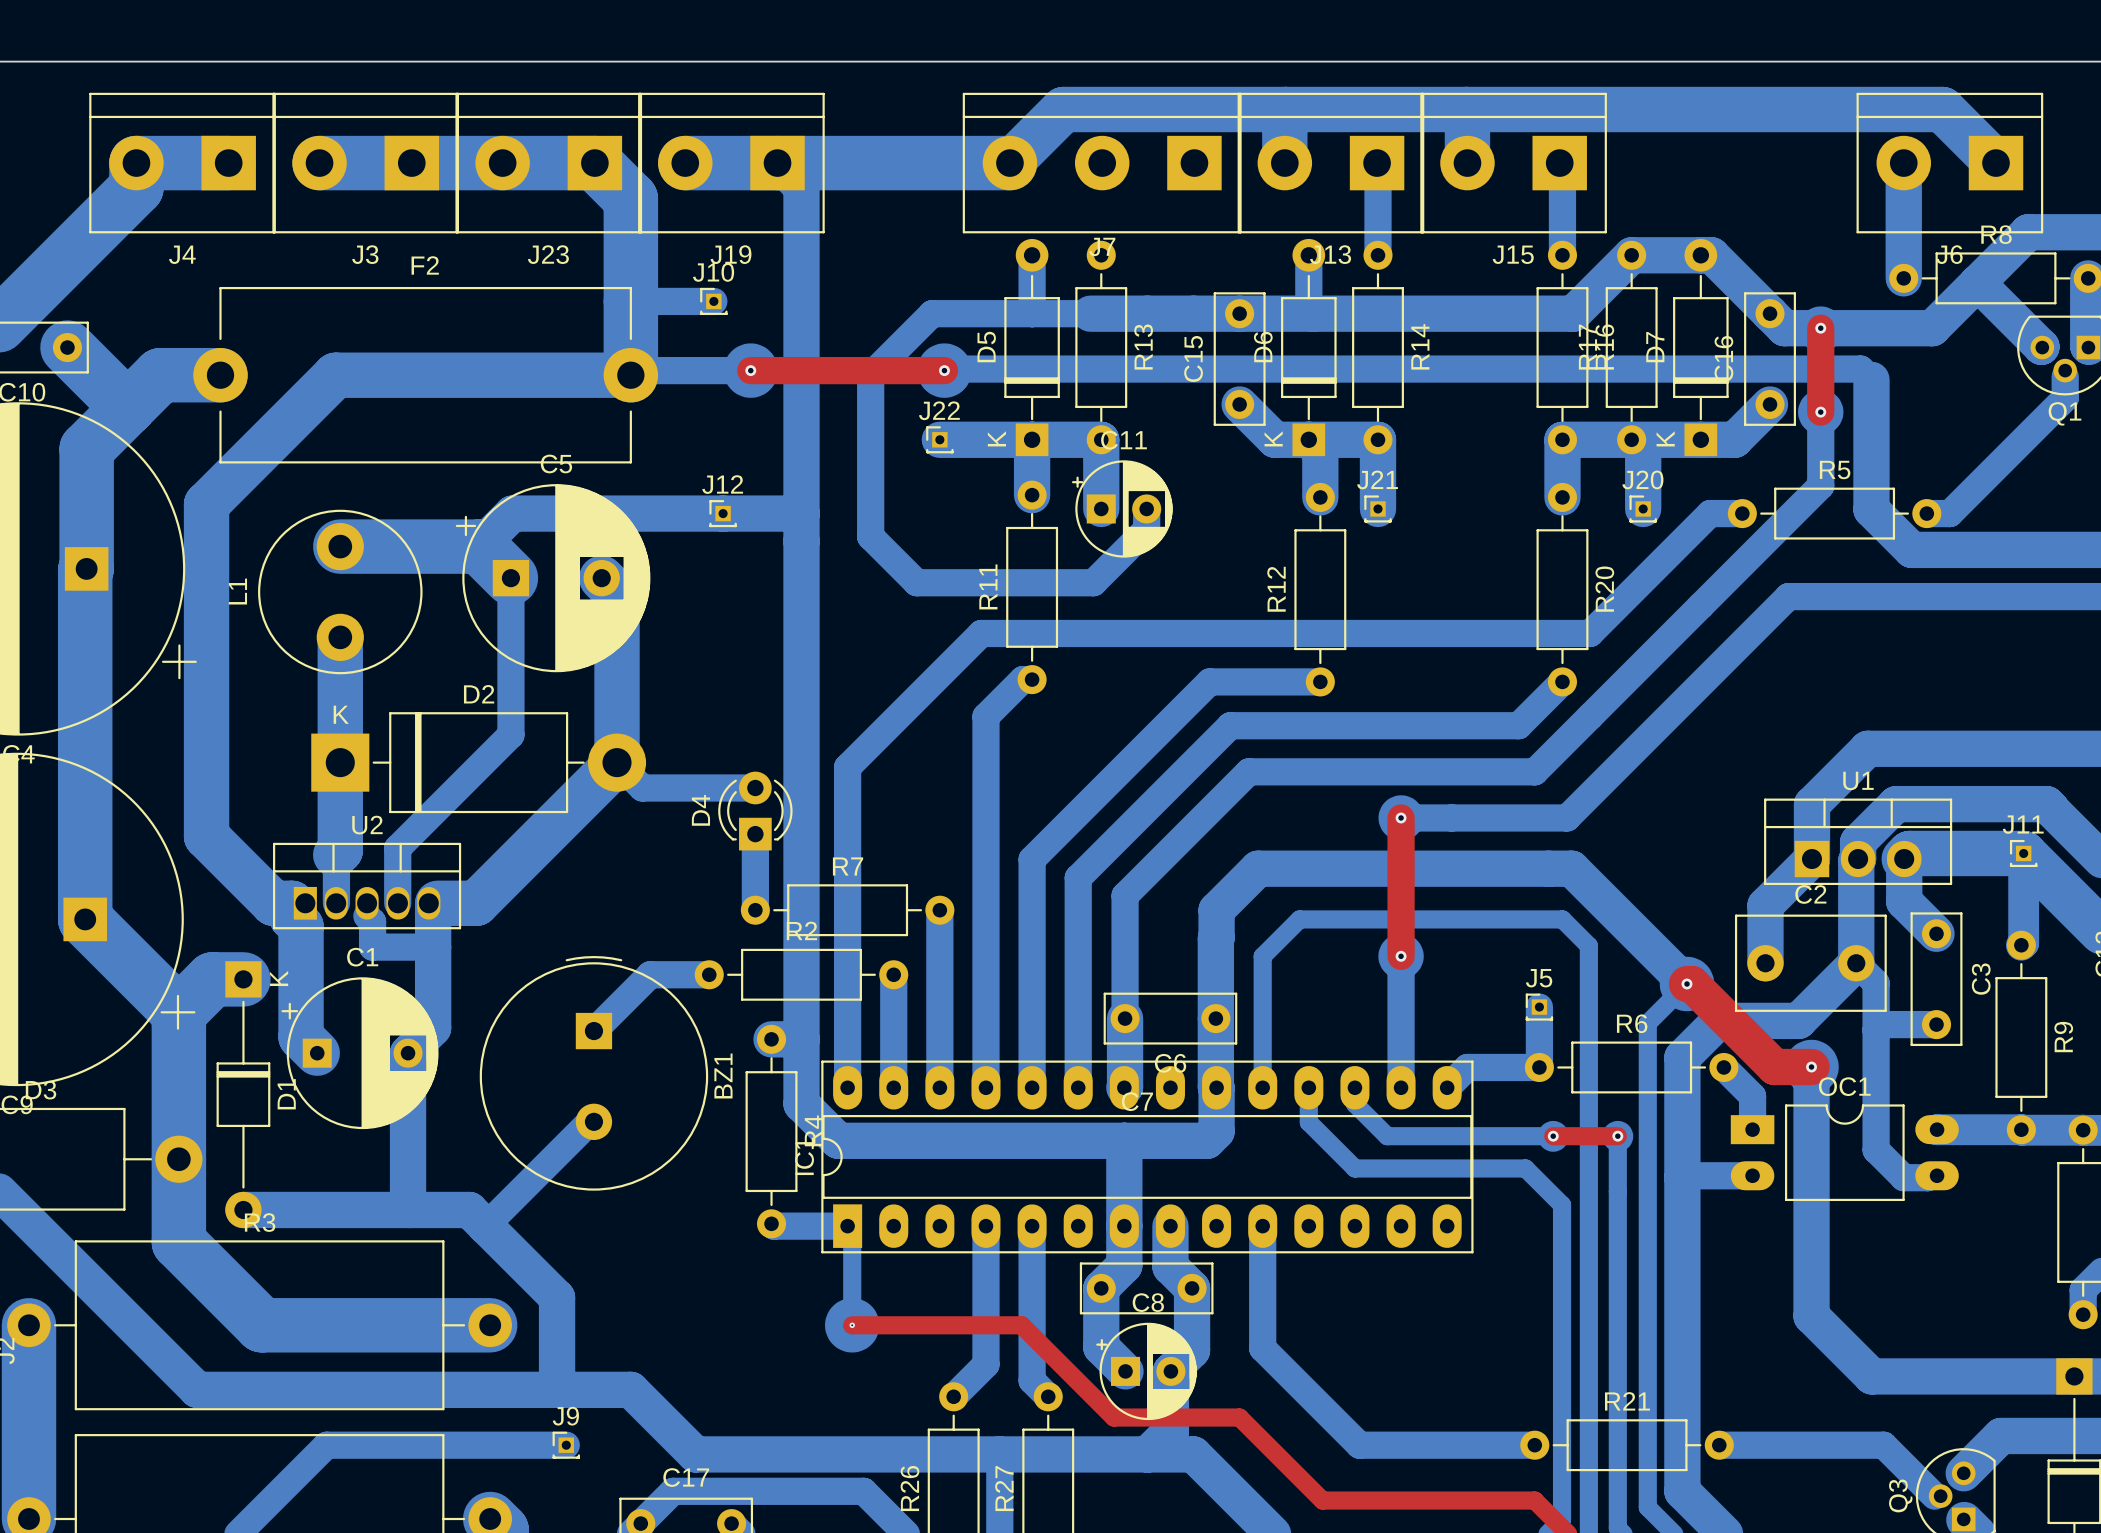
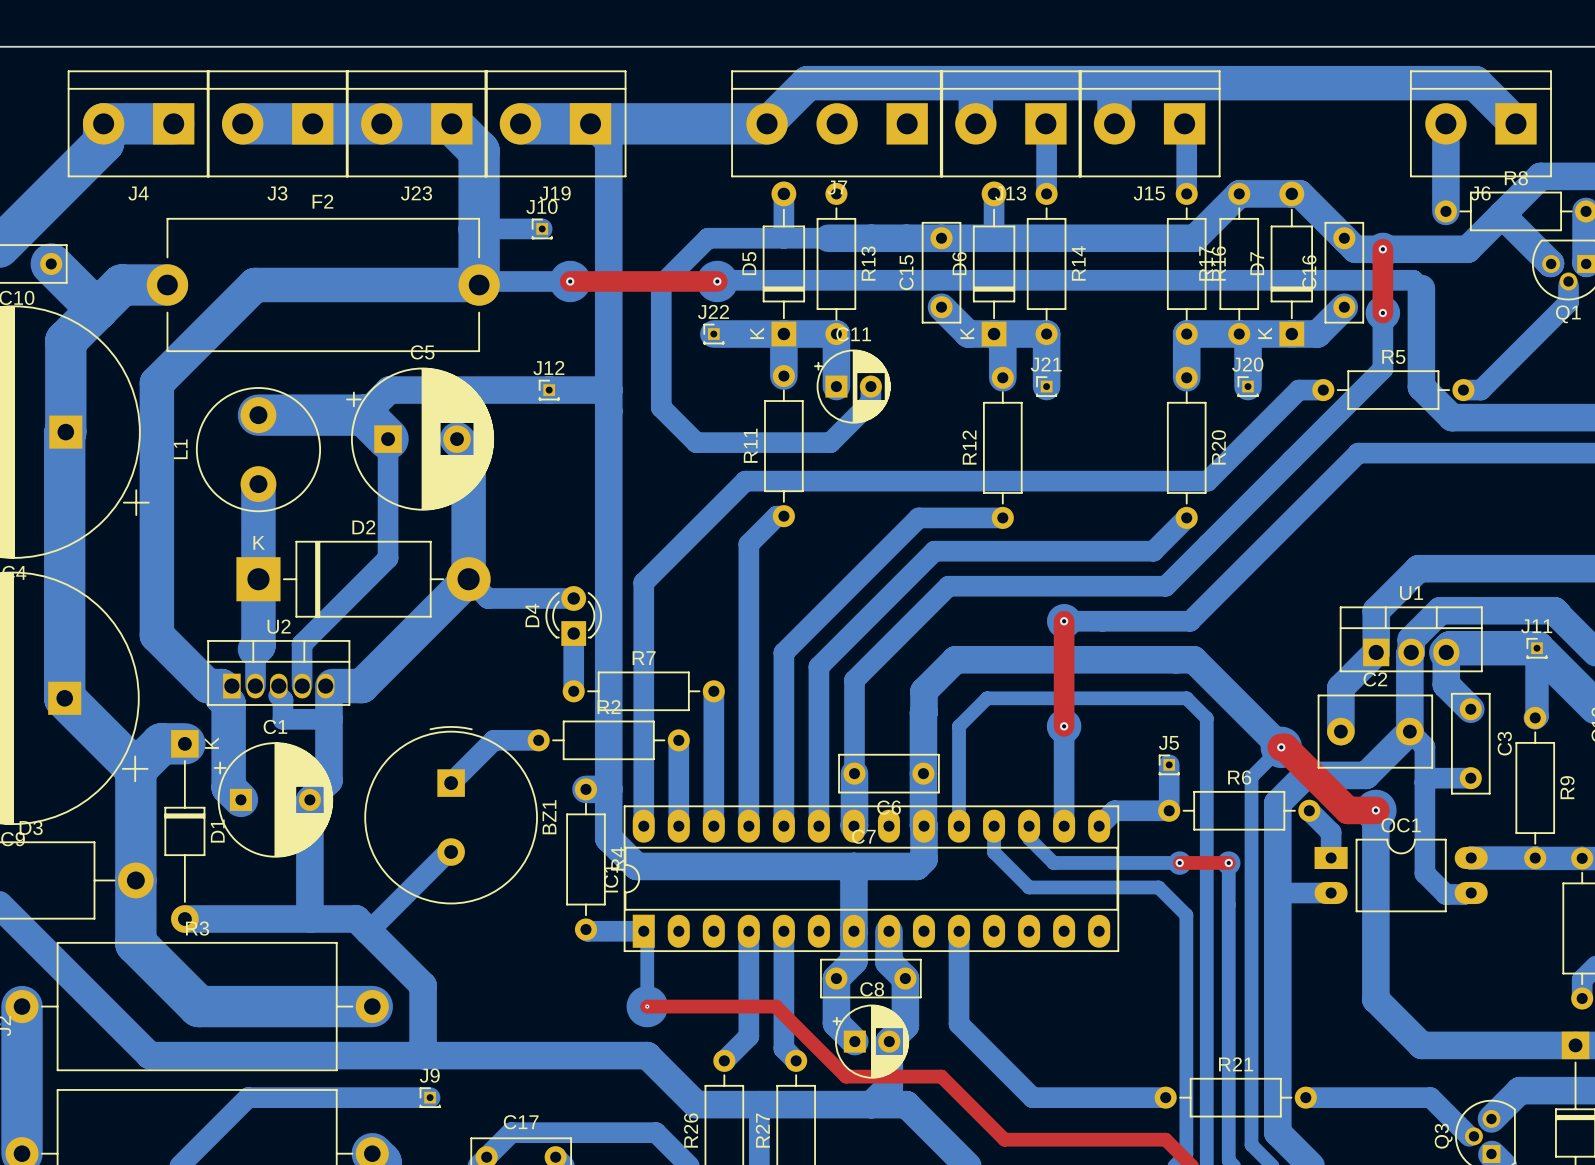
bottom track: (630, 1389) (695, 1454) (916, 1454) -> (479, 1055) (647, 1055) (696, 1104)

